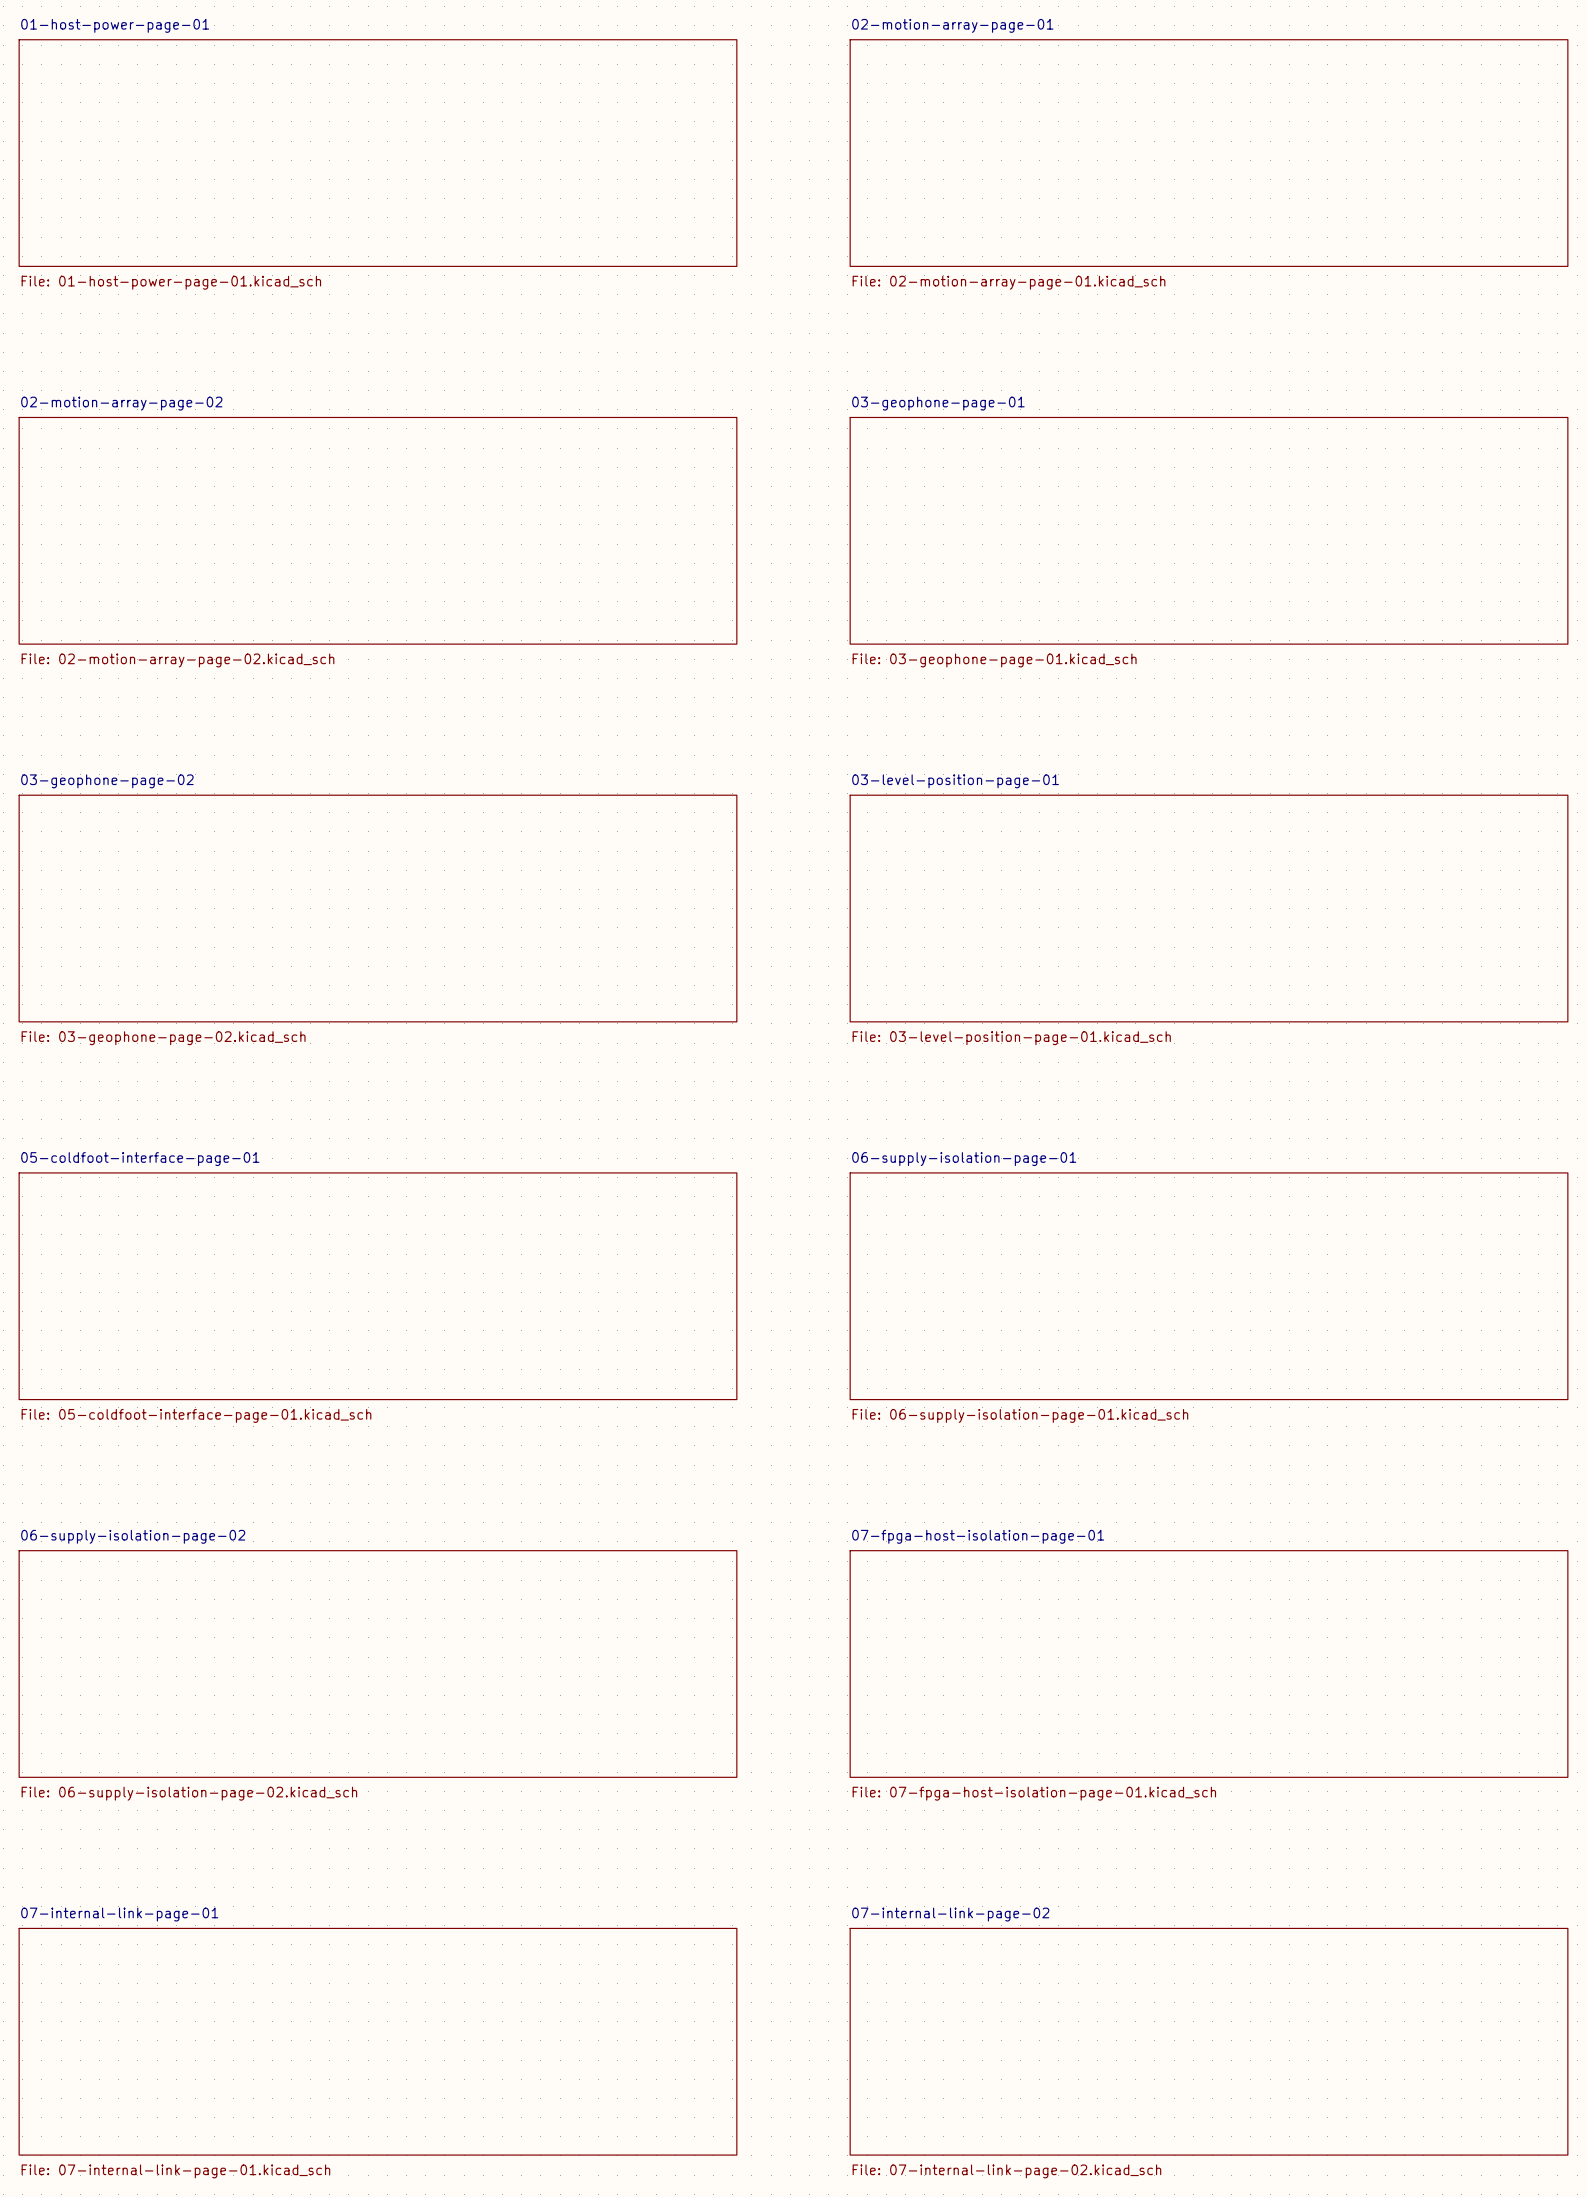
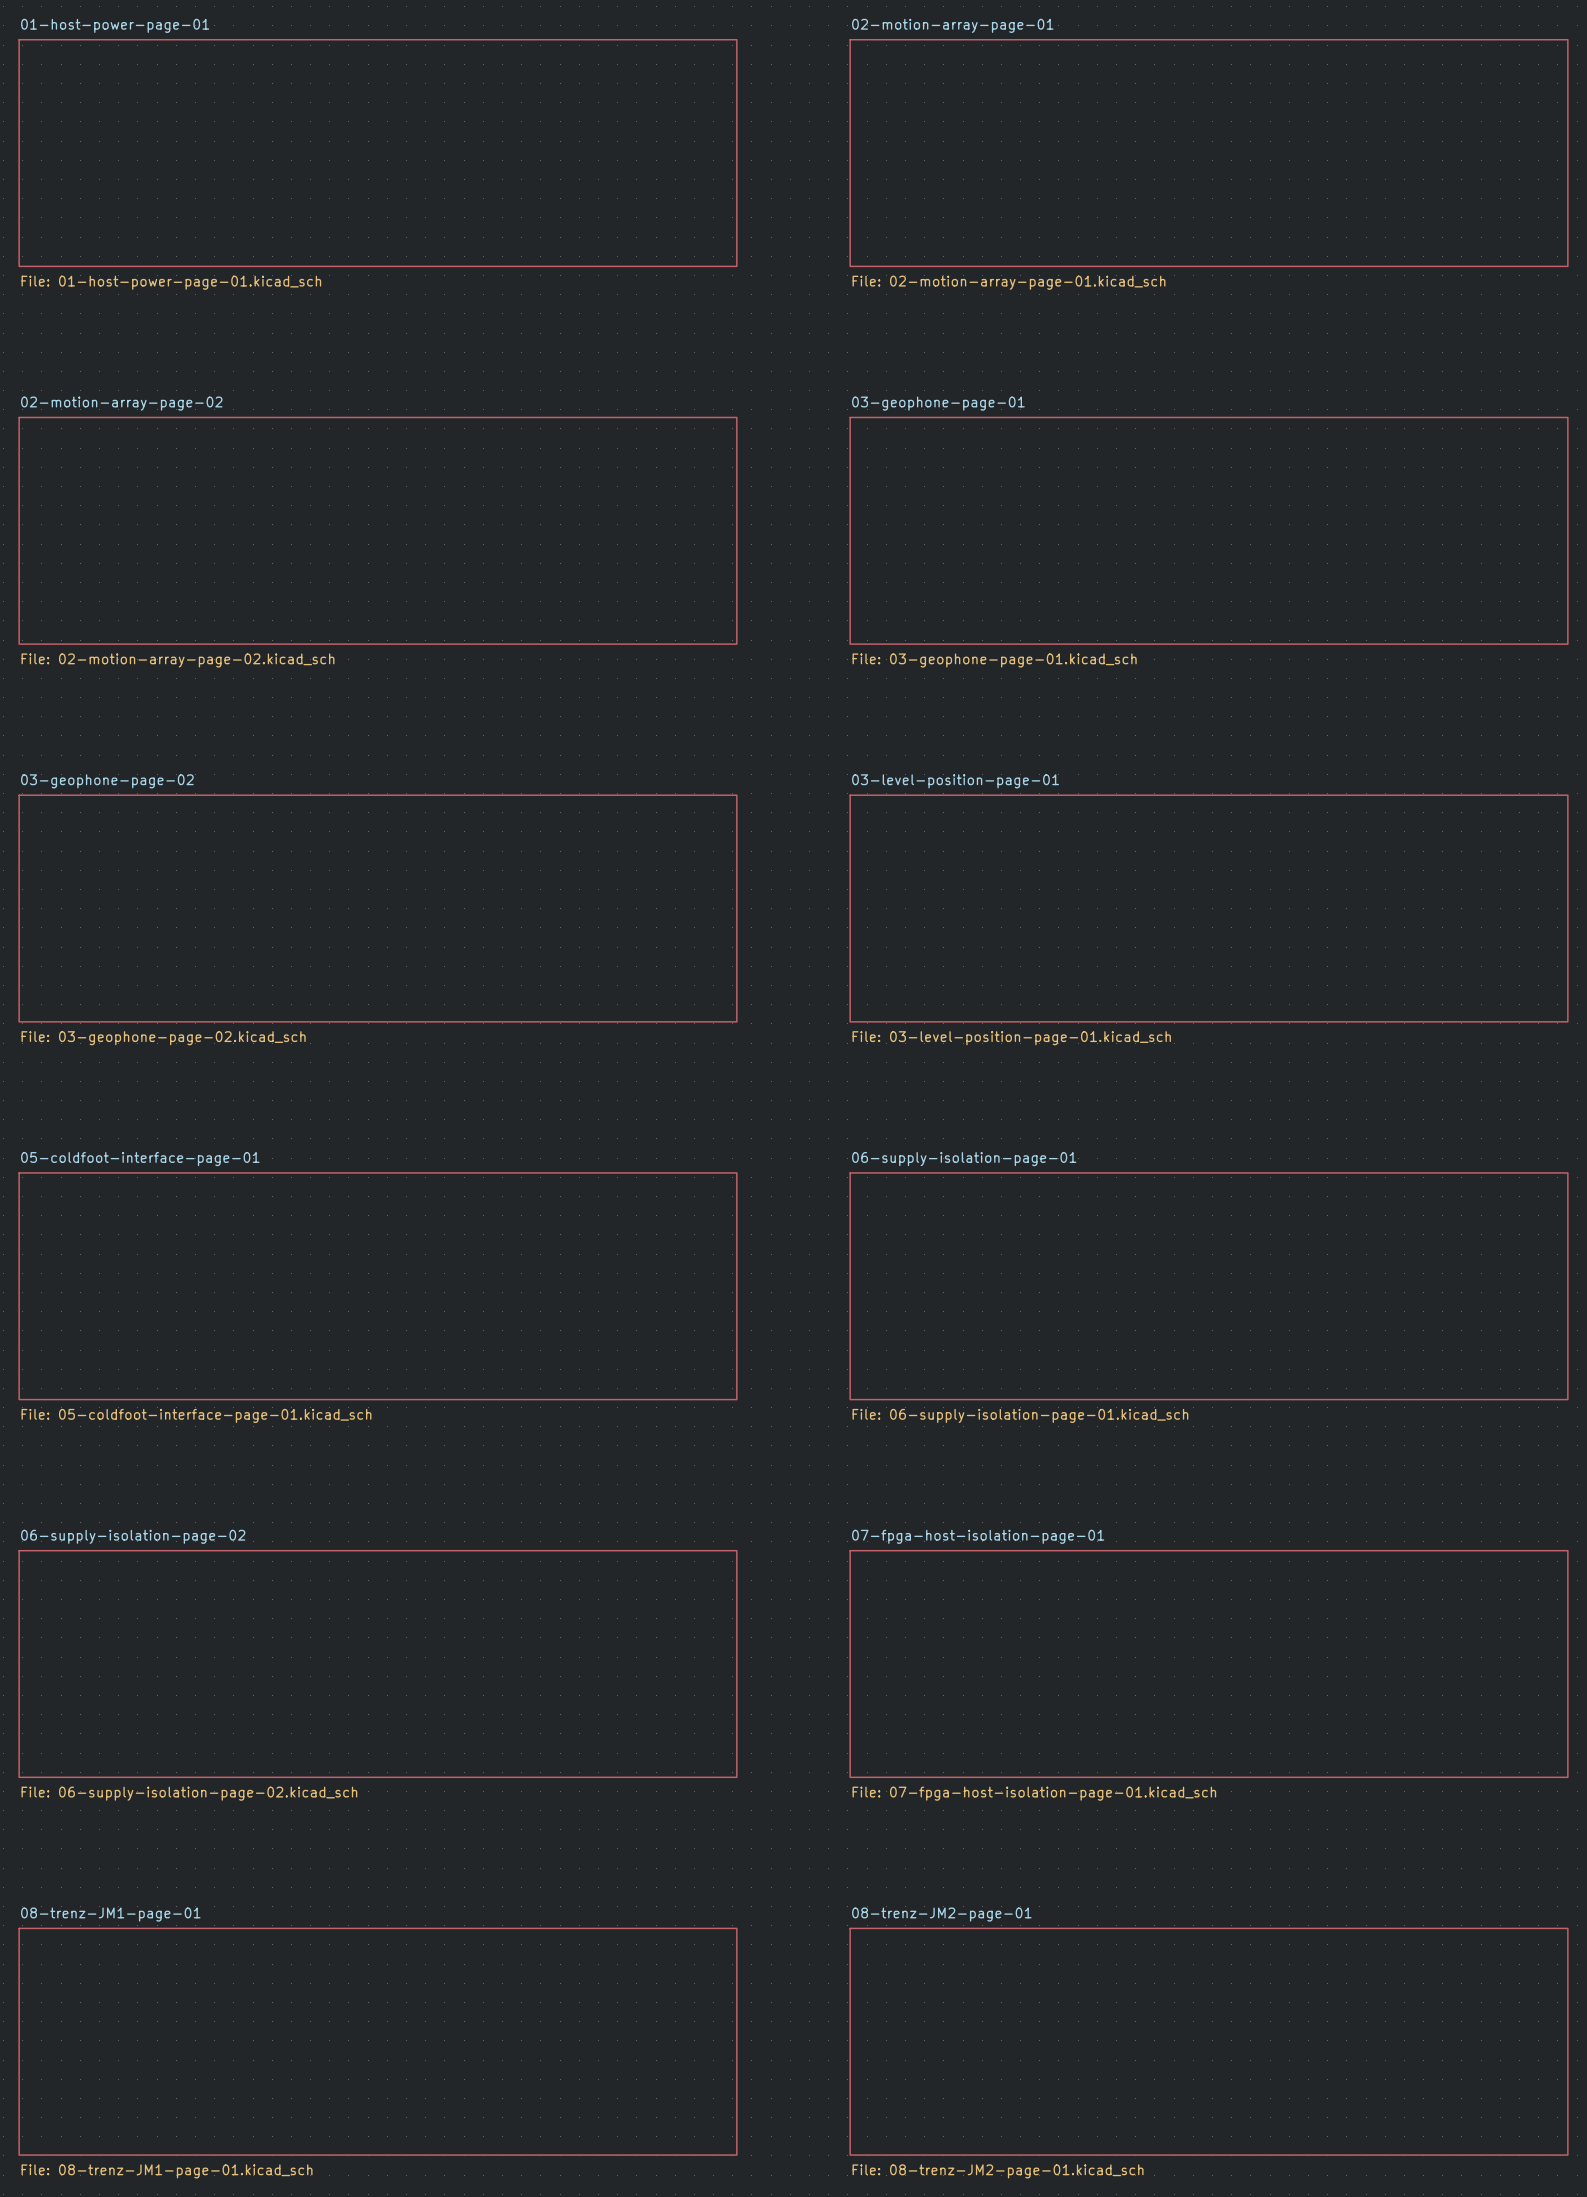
sheet 07-internal-link-page-01 name: 07-internal-link-page-01 (119, 1914) -> 08-trenz-JM1-page-01 (110, 1914)
sheet 07-internal-link-page-02 name: 07-internal-link-page-02 (950, 1914) -> 08-trenz-JM2-page-01 (941, 1914)
sheet 07-internal-link-page-01 value: File: 07-internal-link-page-01.kicad_sch (175, 2171) -> File: 08-trenz-JM1-page-01.kicad_sch (167, 2171)
sheet 07-internal-link-page-02 value: File: 07-internal-link-page-02.kicad_sch (1006, 2171) -> File: 08-trenz-JM2-page-01.kicad_sch (998, 2171)

